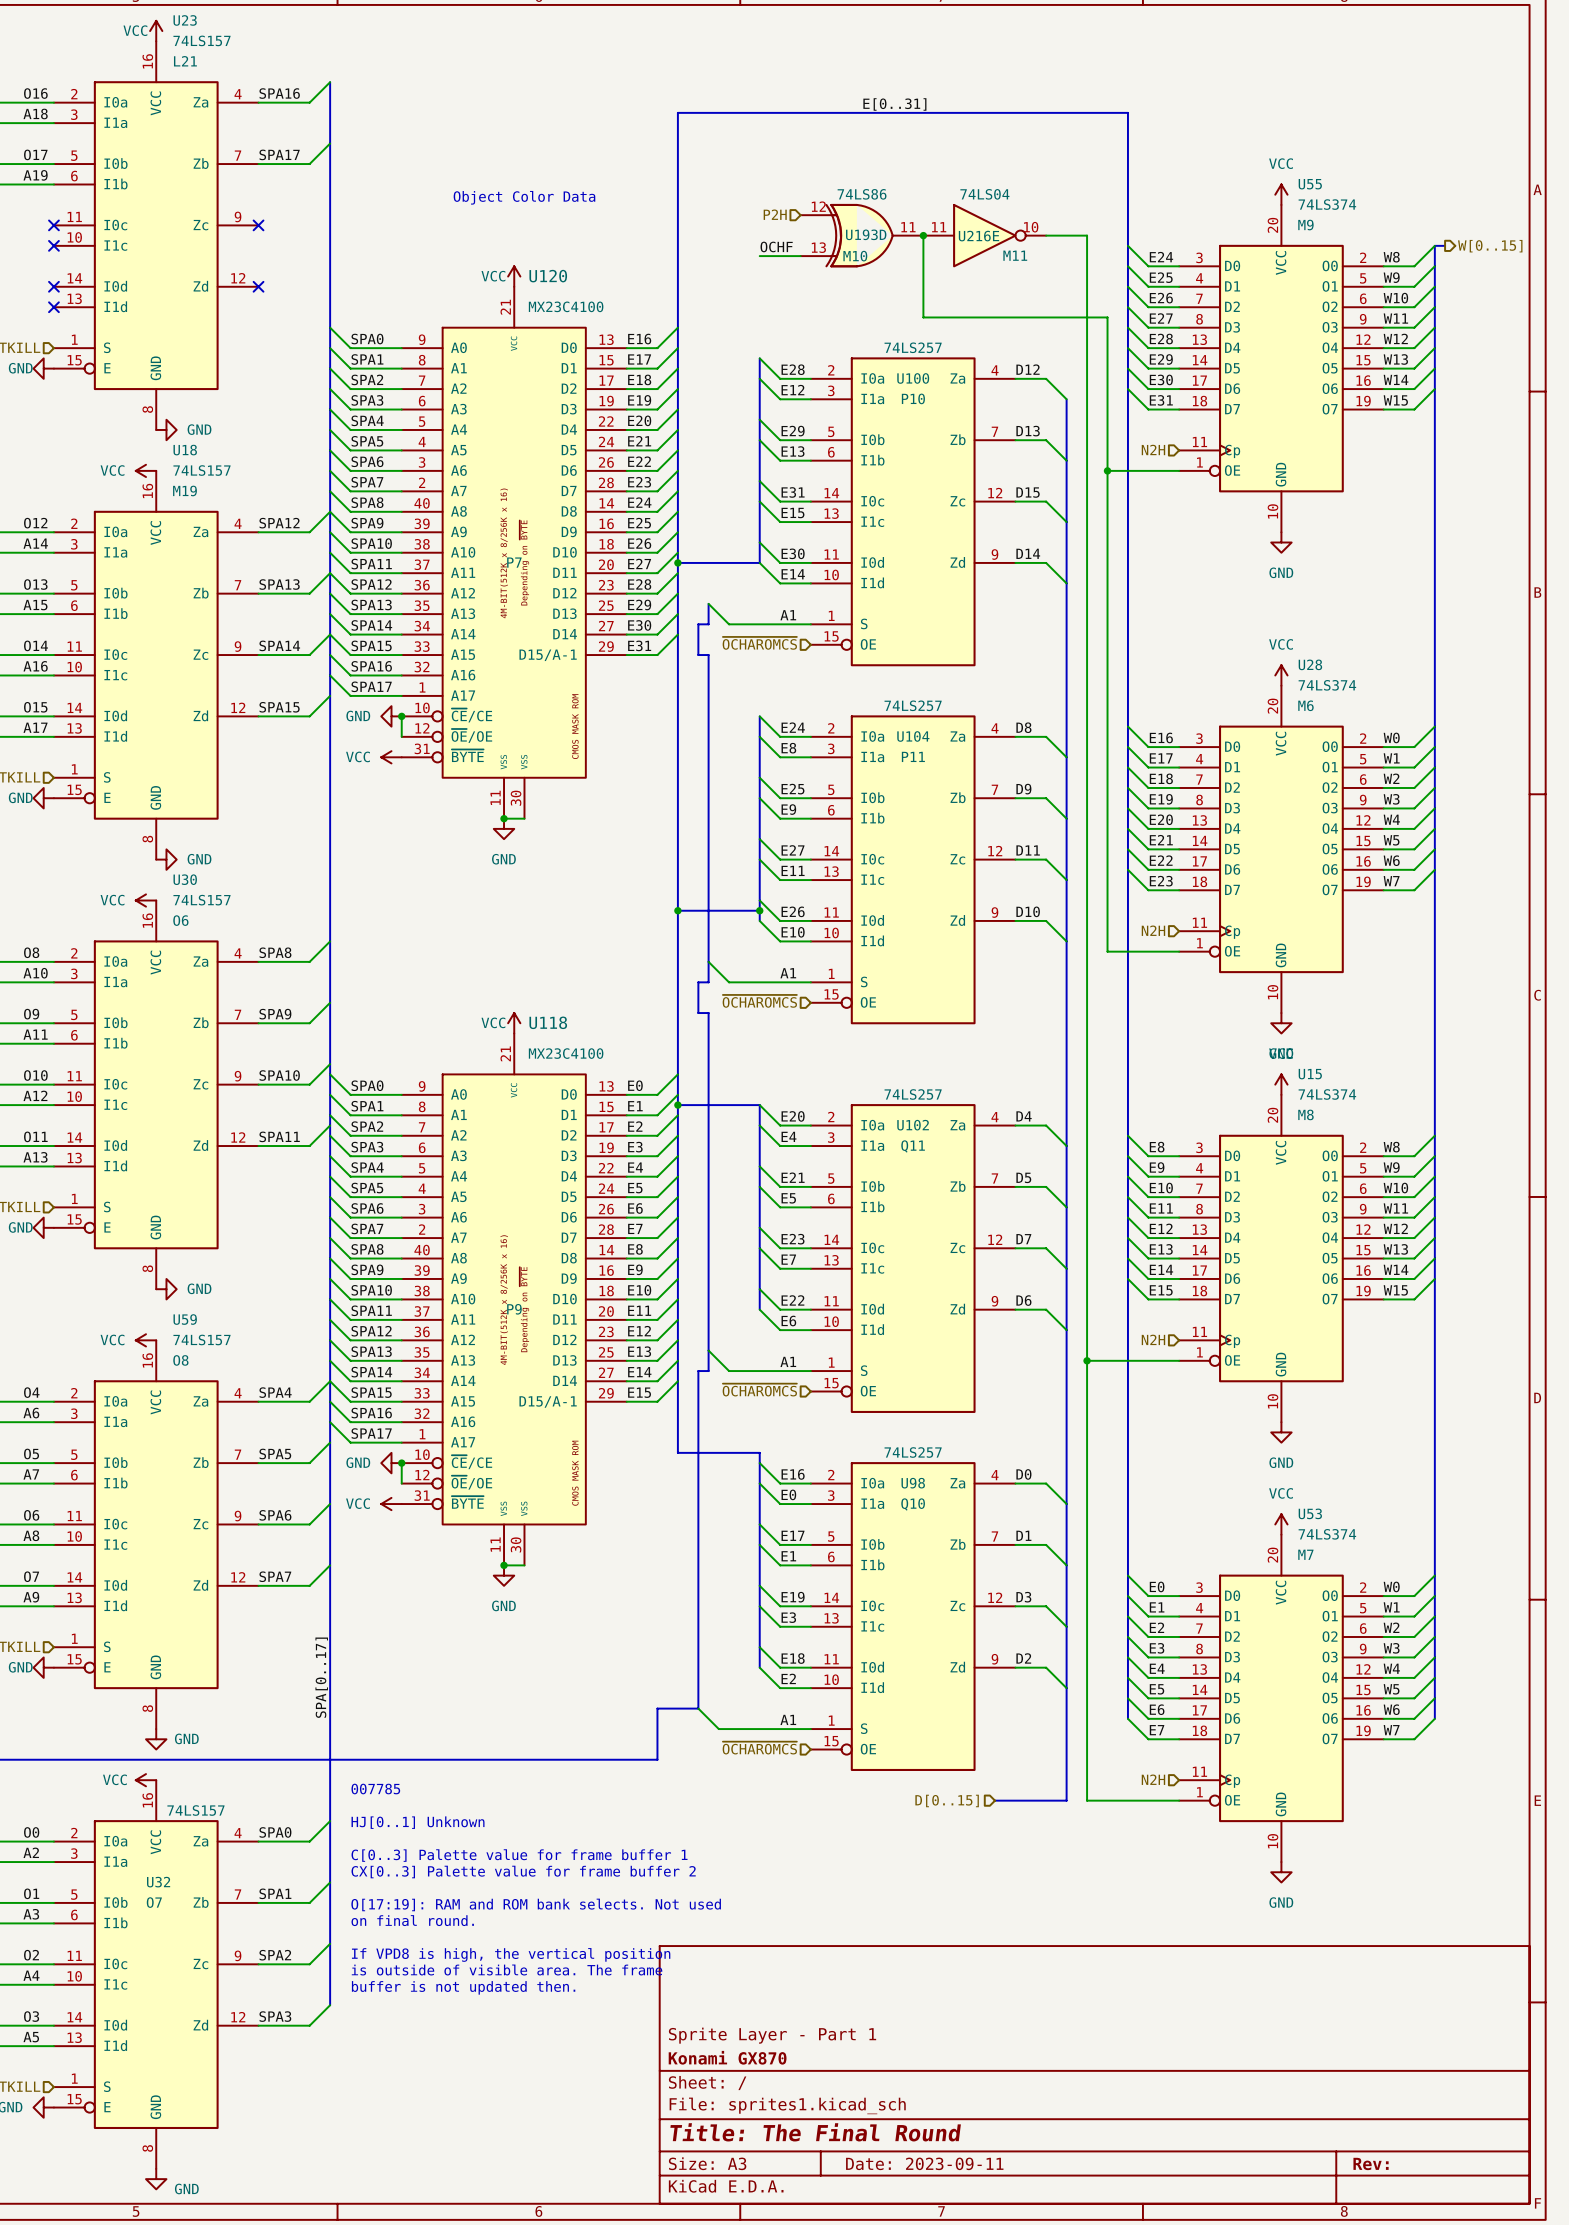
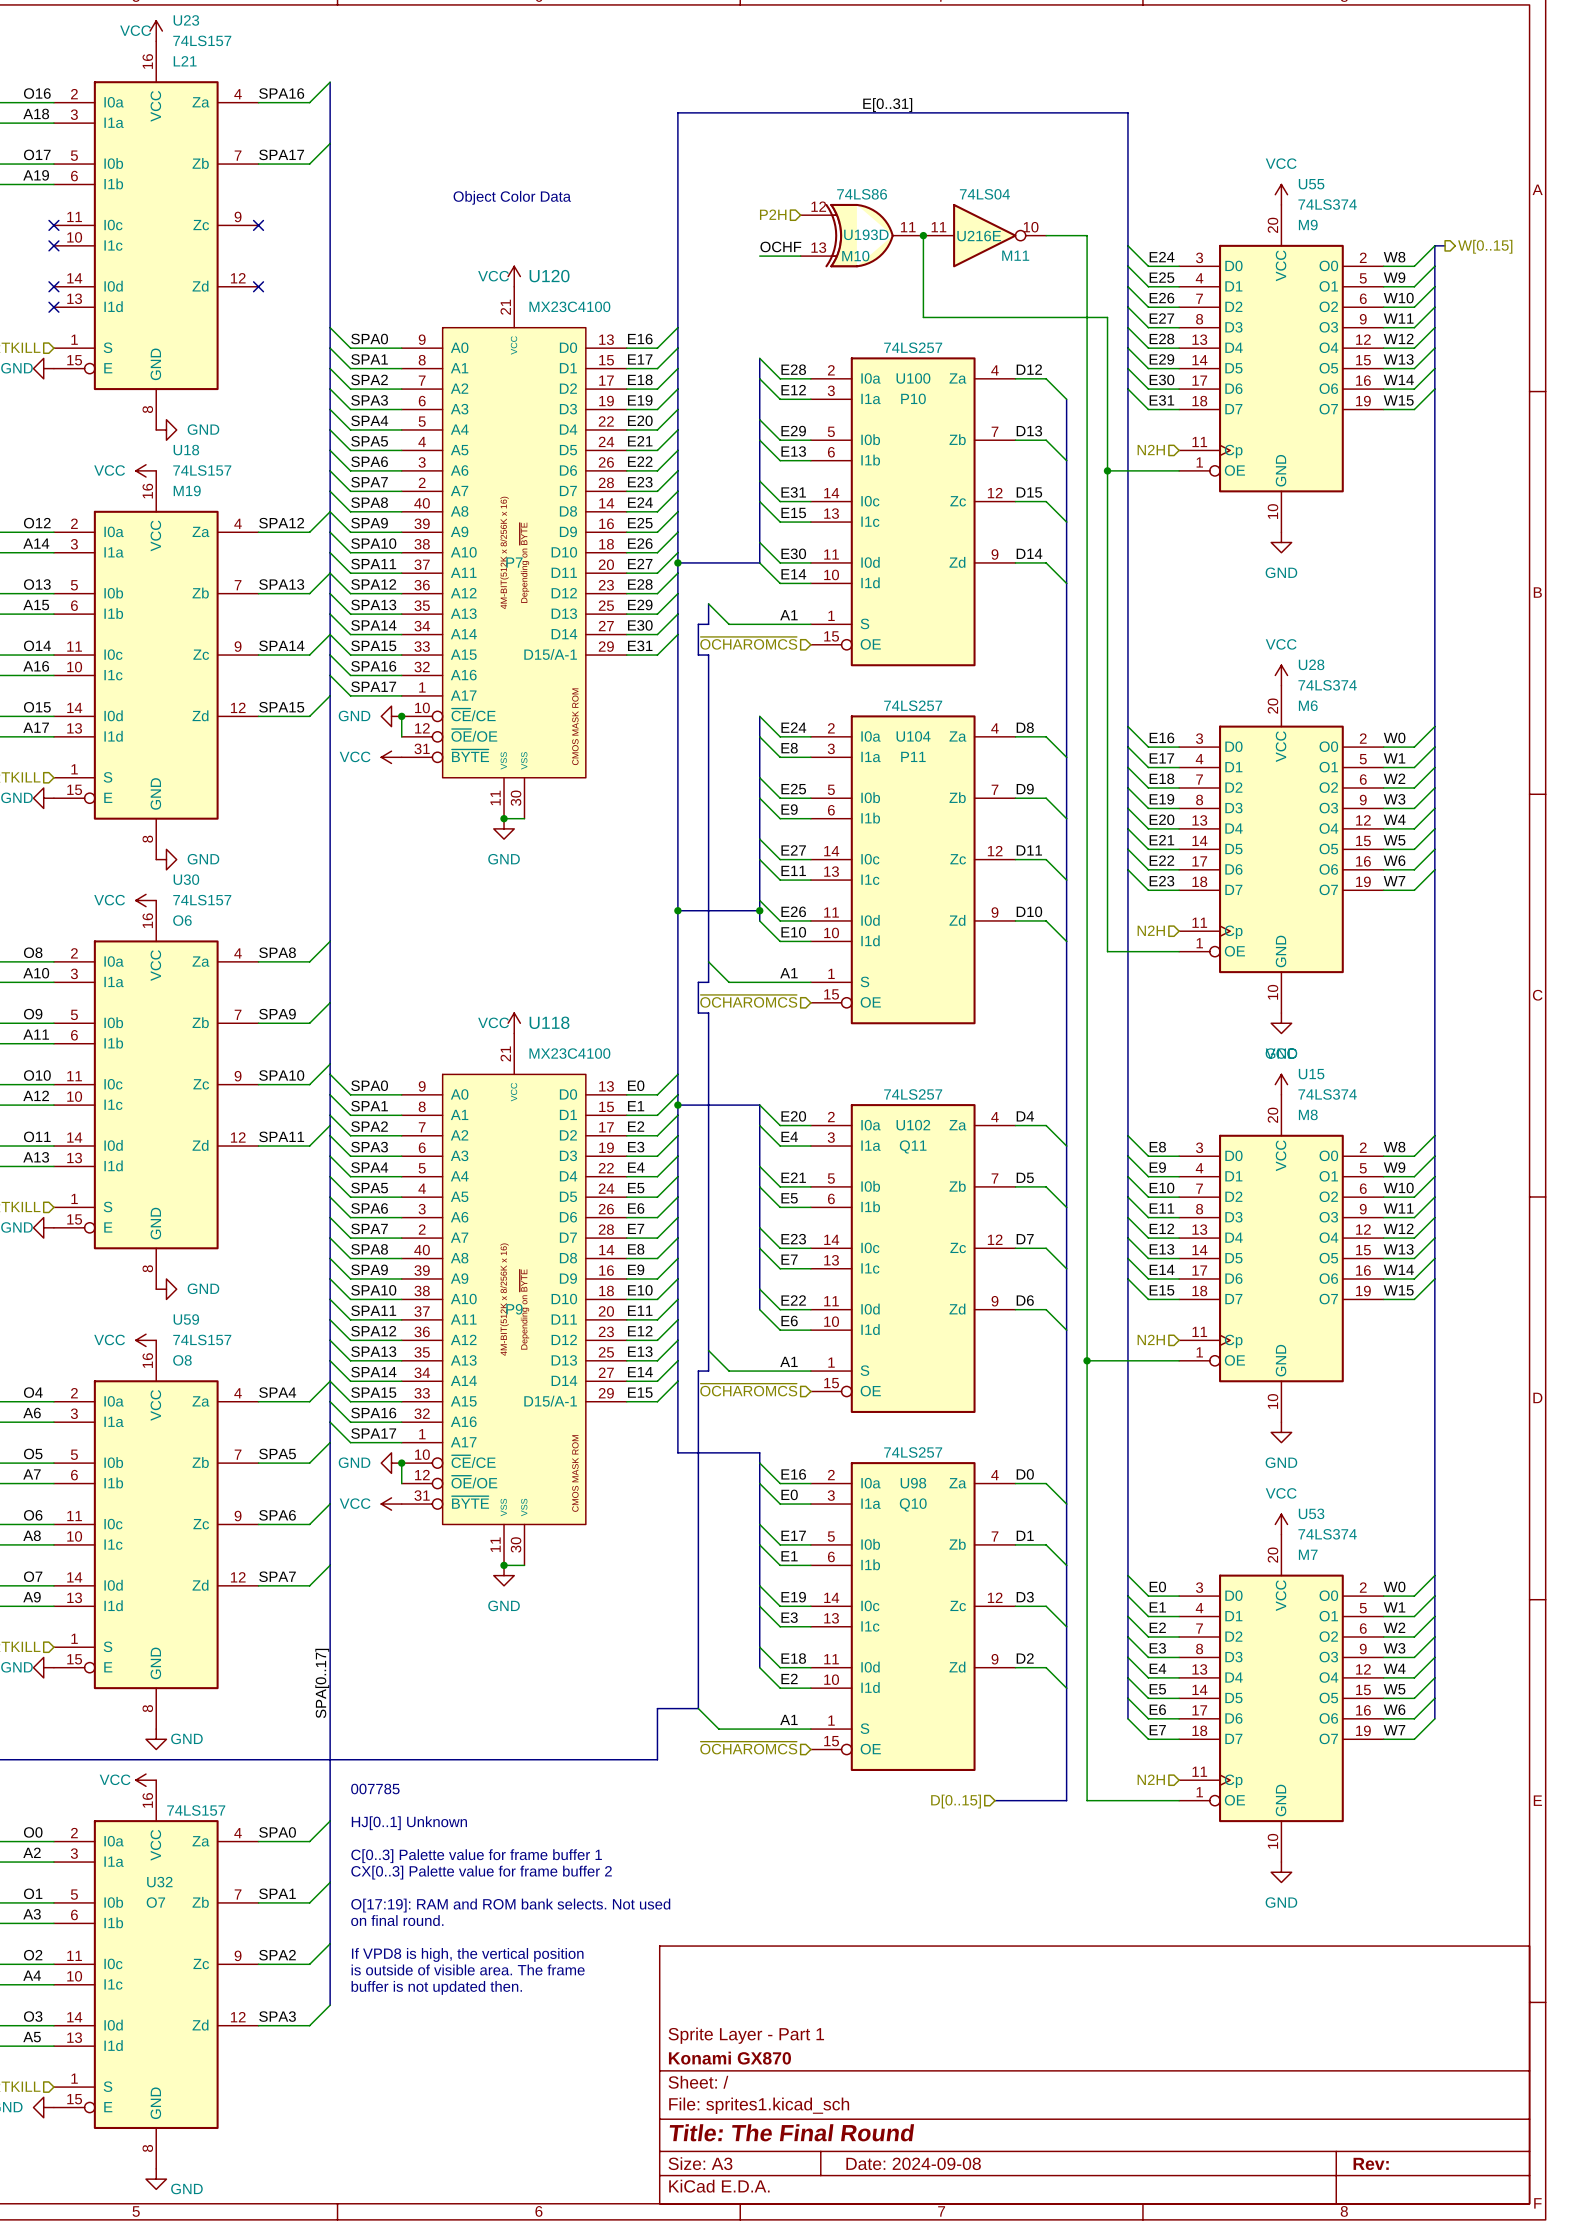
title block: Date: 2023-09-11 (924, 2163) -> Date: 2024-09-08 (913, 2163)

